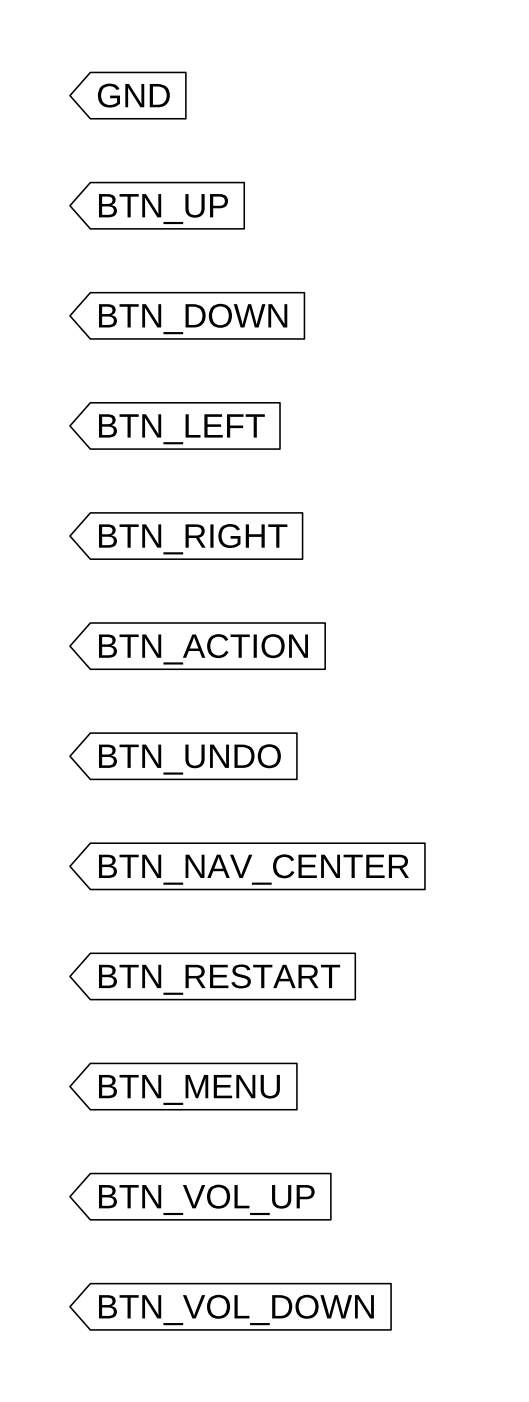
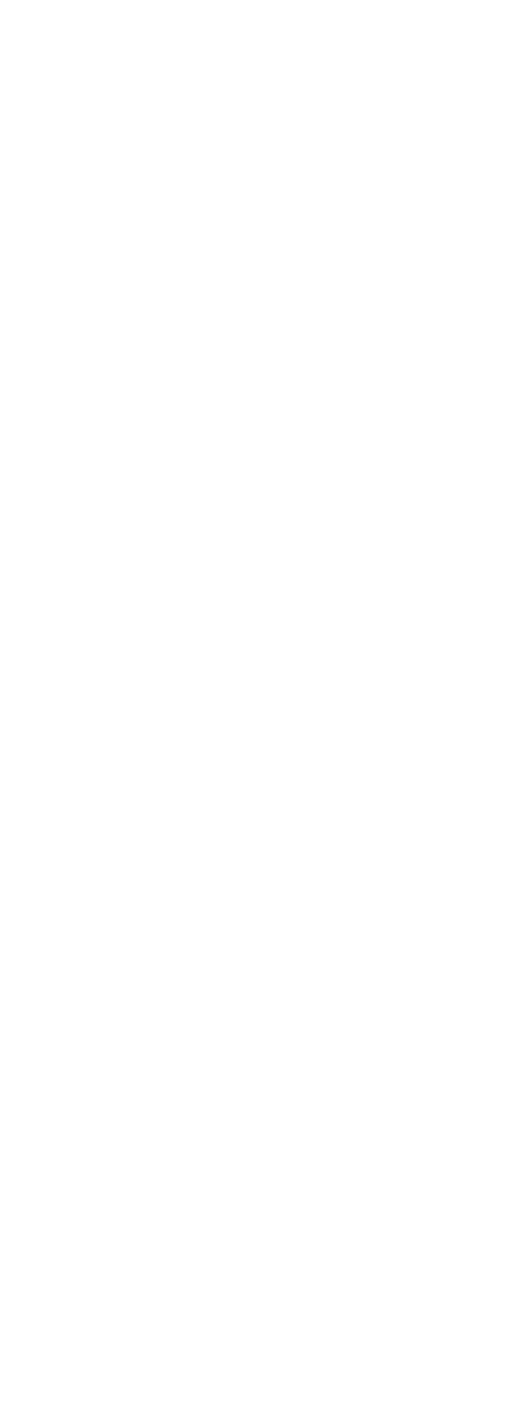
global label: GND (133, 95) -> none
global label: BTN_UP (163, 209) -> none
global label: BTN_DOWN (193, 319) -> none
global label: BTN_LEFT (181, 429) -> none
global label: BTN_RIGHT (193, 539) -> none
global label: BTN_ACTION (203, 649) -> none
global label: BTN_UNDO (189, 759) -> none
global label: BTN_NAV_CENTER (253, 869) -> none
global label: BTN_RESTART (219, 979) -> none
global label: BTN_MENU (189, 1089) -> none
global label: BTN_VOL_UP (206, 1199) -> none
global label: BTN_VOL_DOWN (236, 1309) -> none

